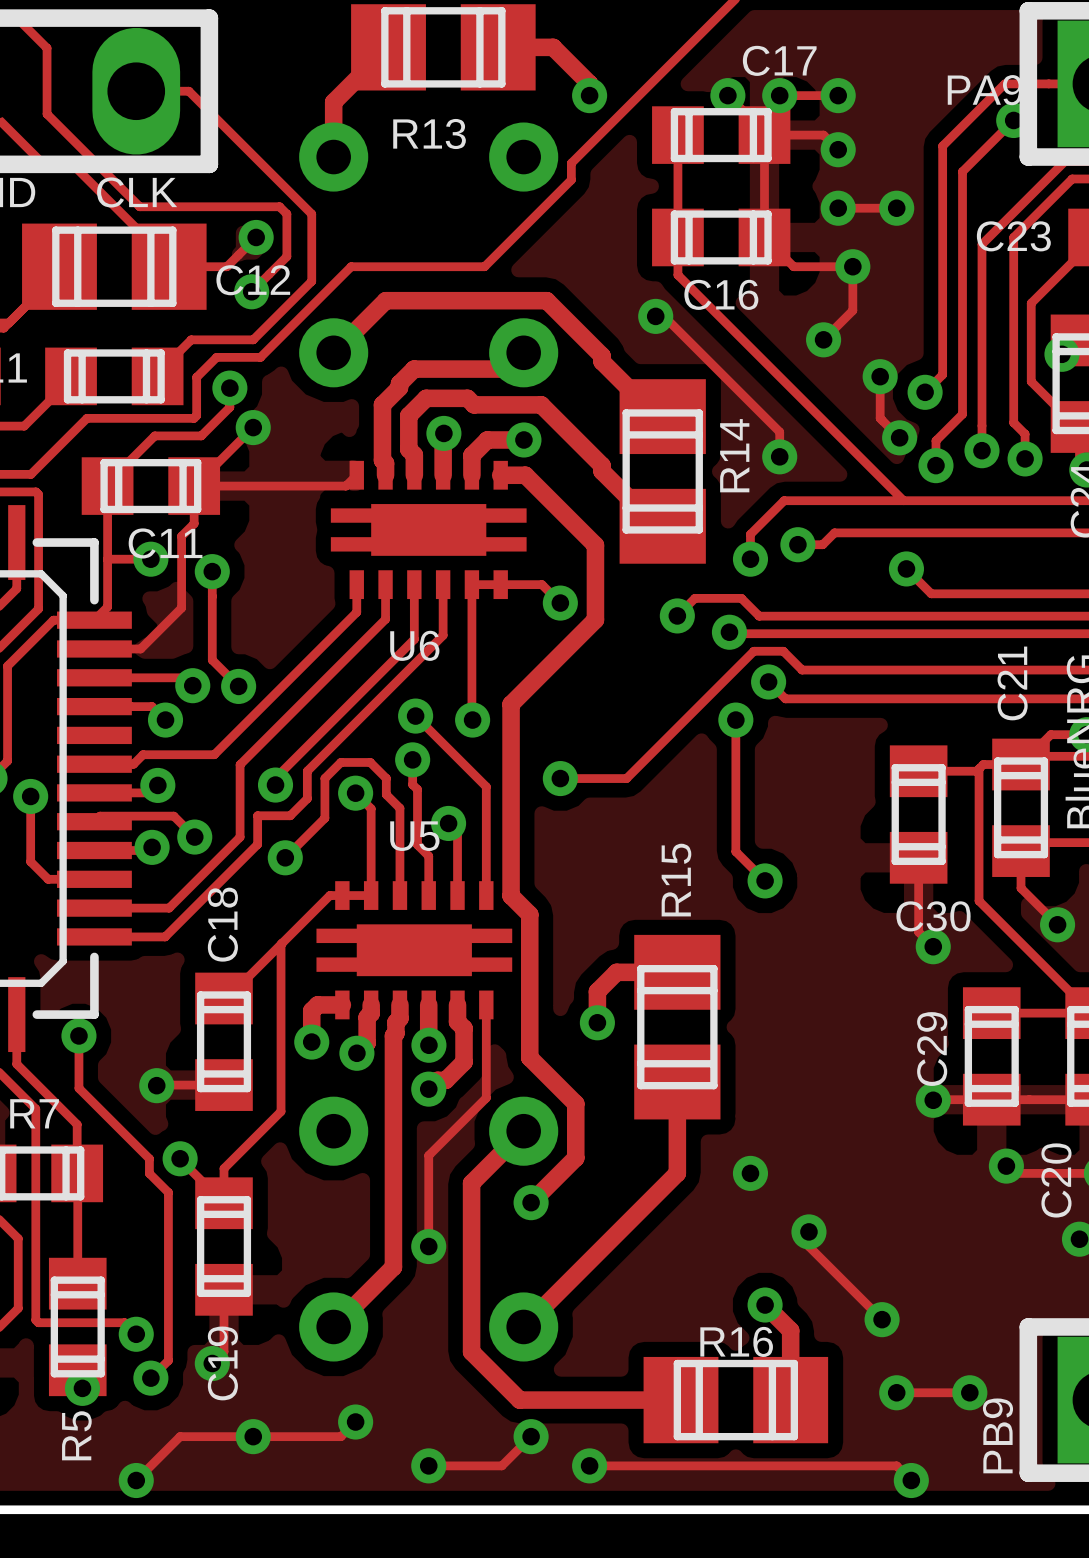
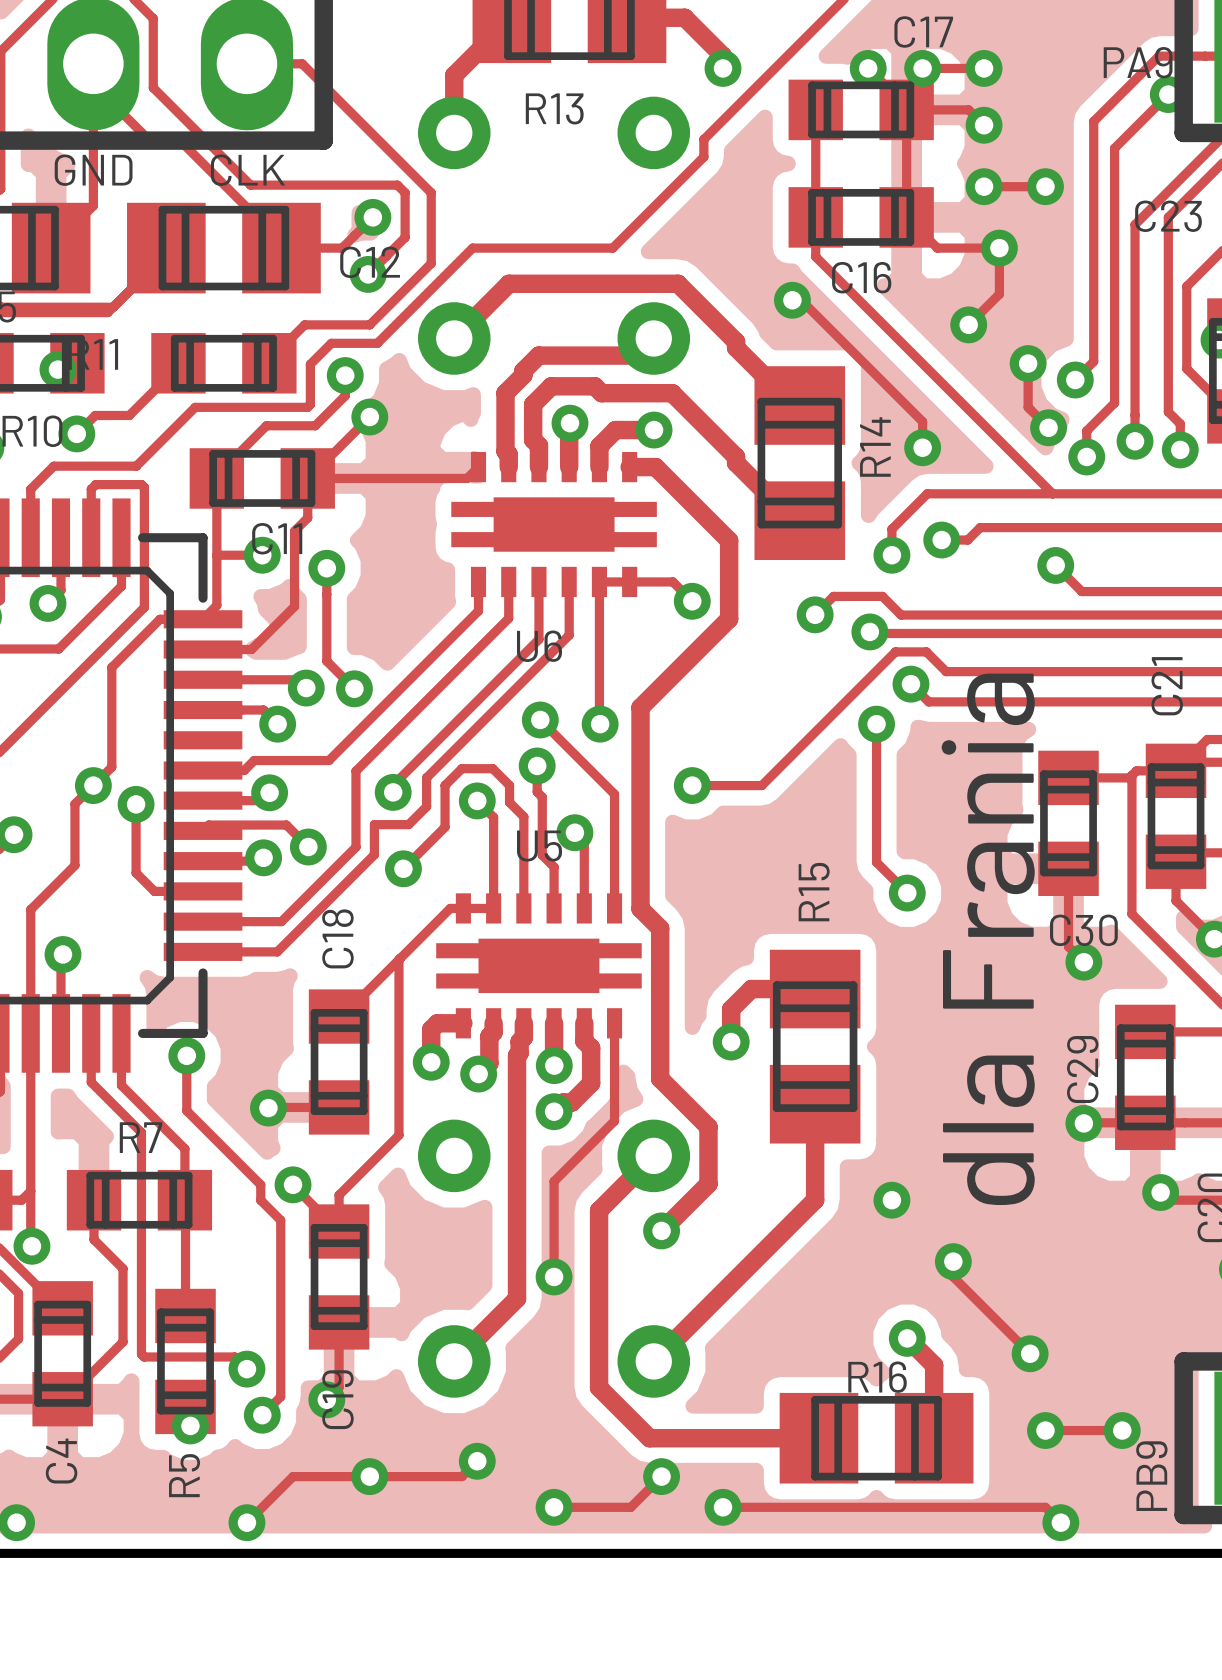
text: none -> dla Frania (988, 939)

